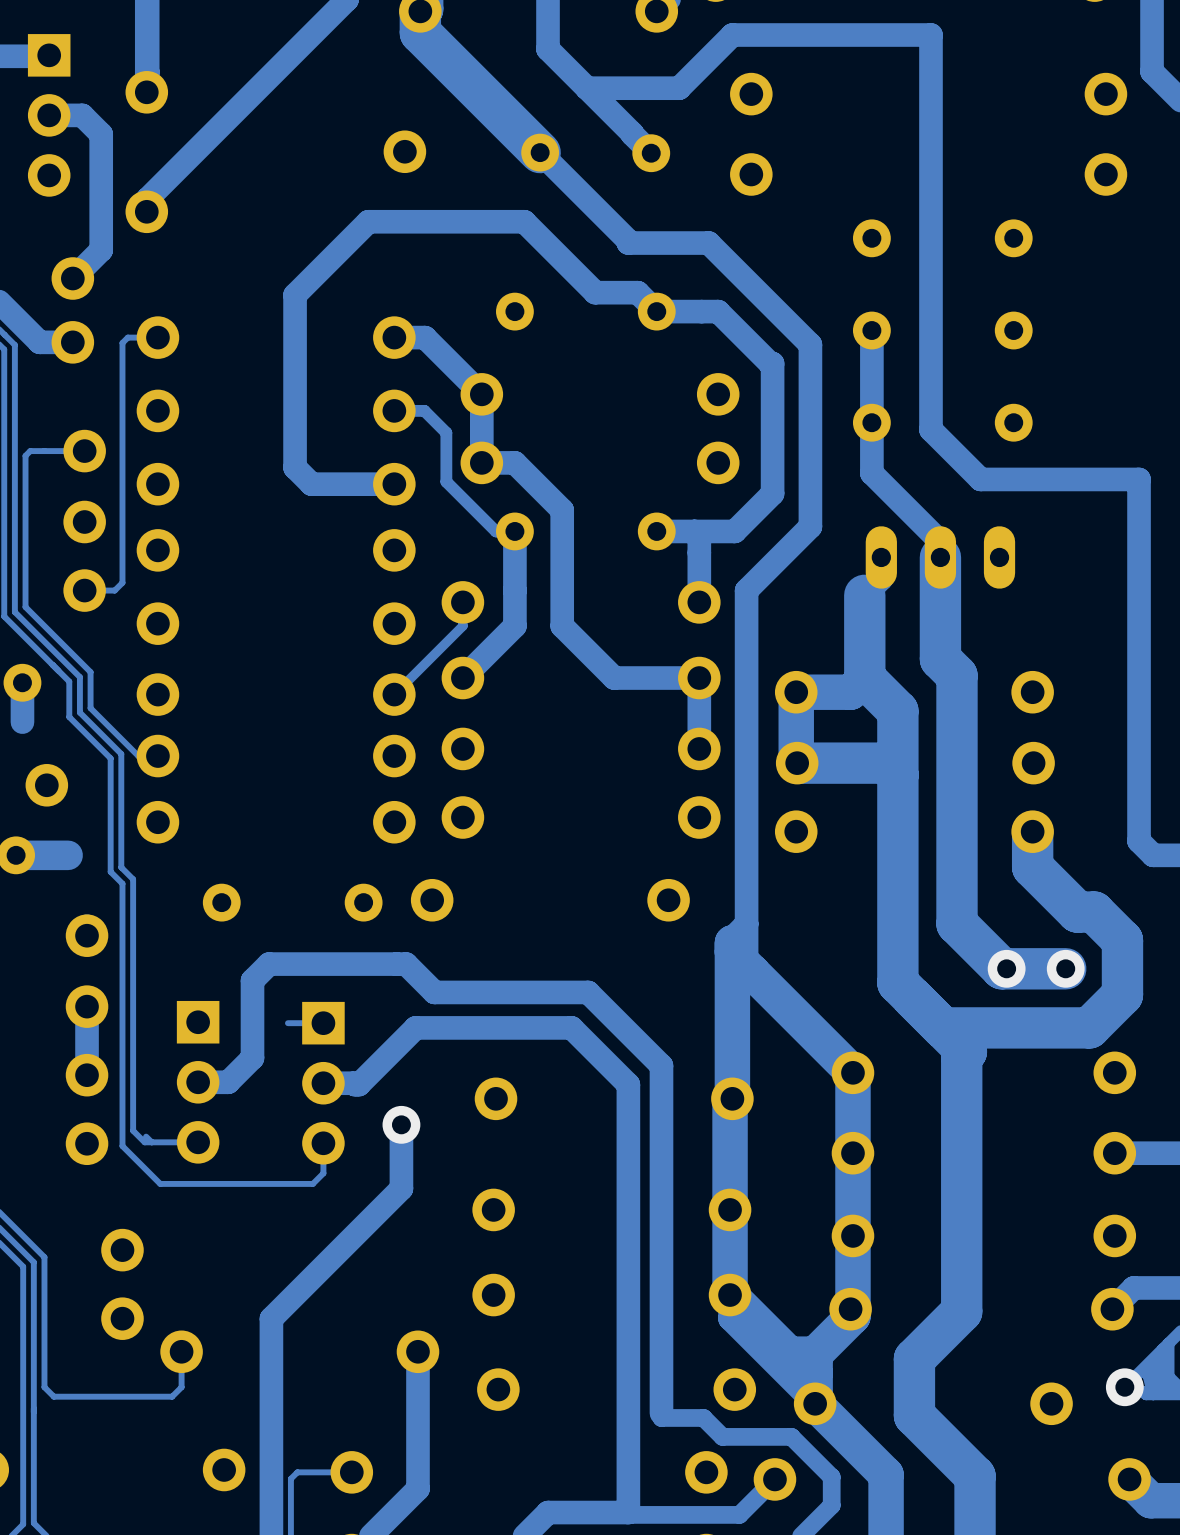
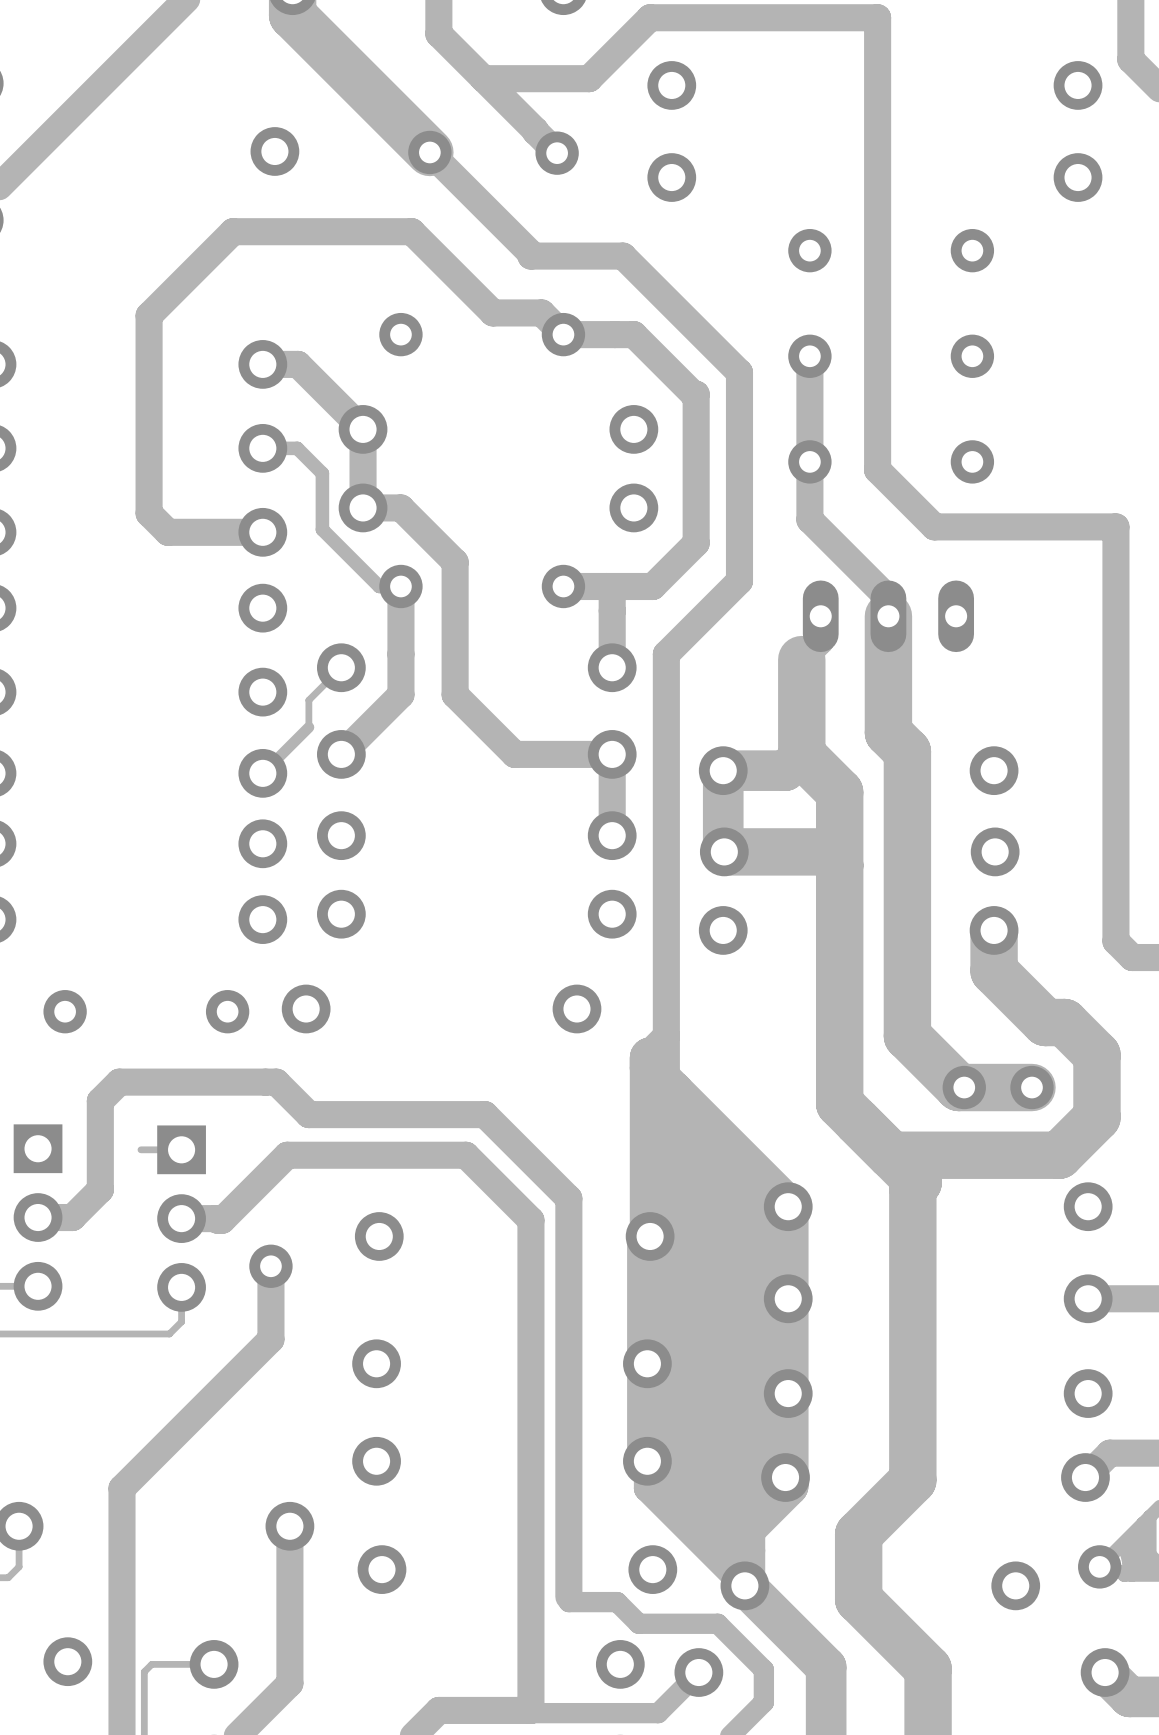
track: (462, 602) (462, 626) (434, 654) -> (341, 667) (308, 700) (308, 727)
track: none -> (674, 1209) (717, 1209) (717, 1458) (709, 1466) (693, 1466) (688, 1461) (688, 1350) (674, 1336) (674, 1130) (753, 1209) (753, 1466) (723, 1496) (723, 1528)

